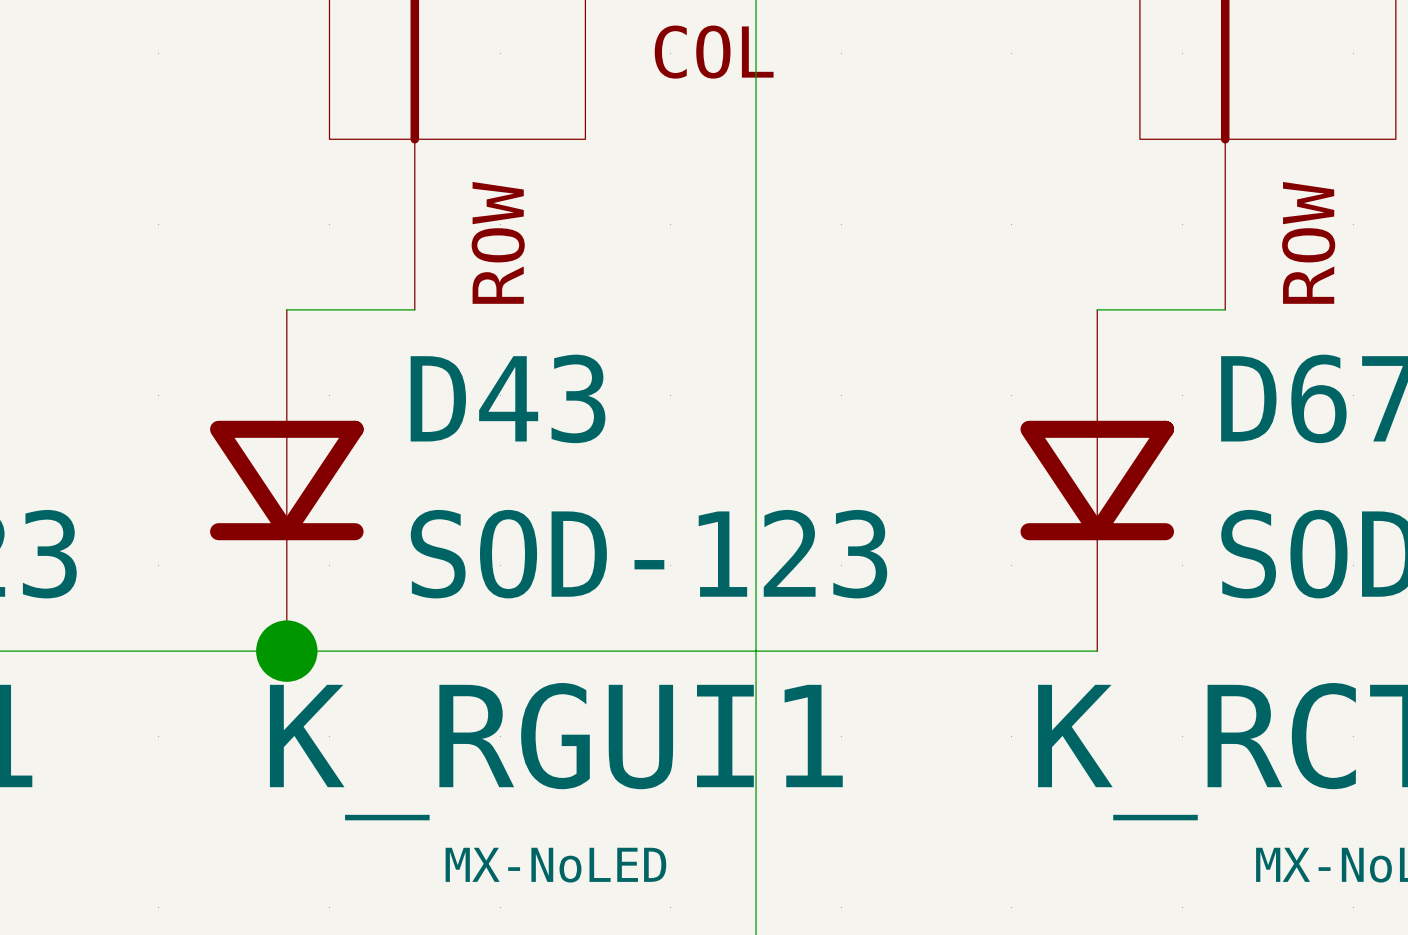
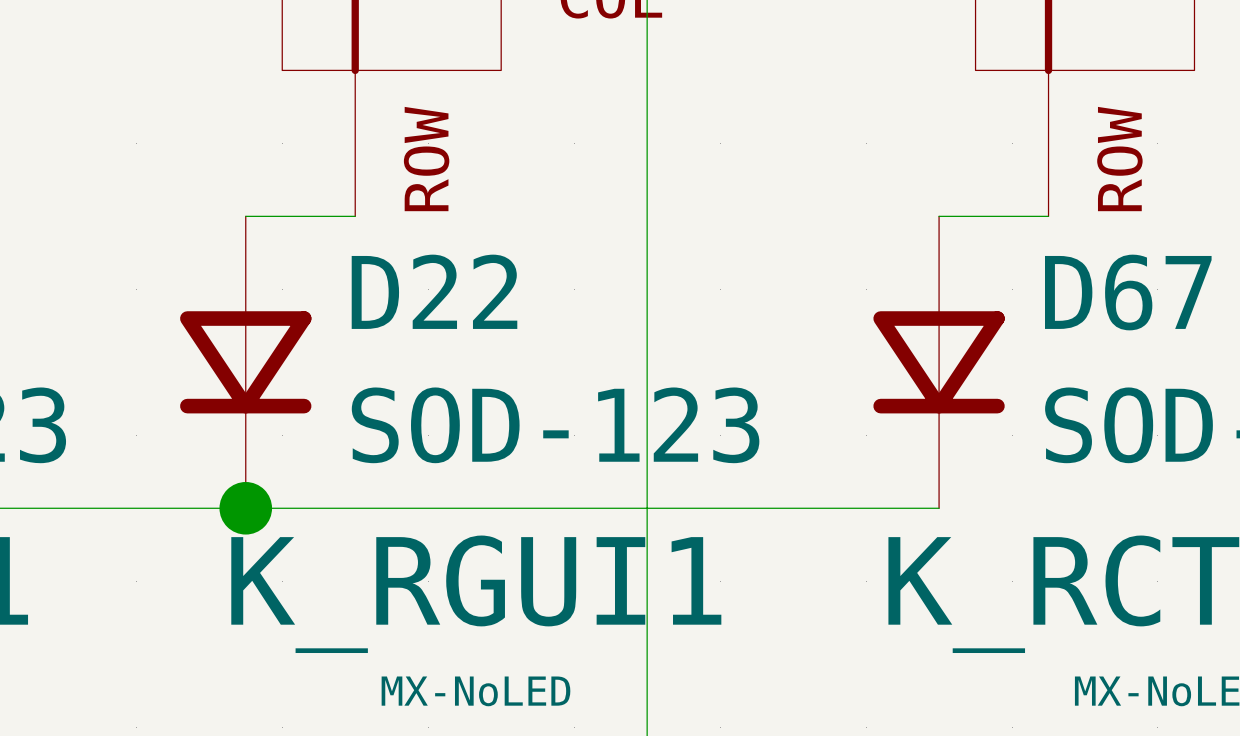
D43 name: D43 (508, 398) -> D22 (434, 291)

